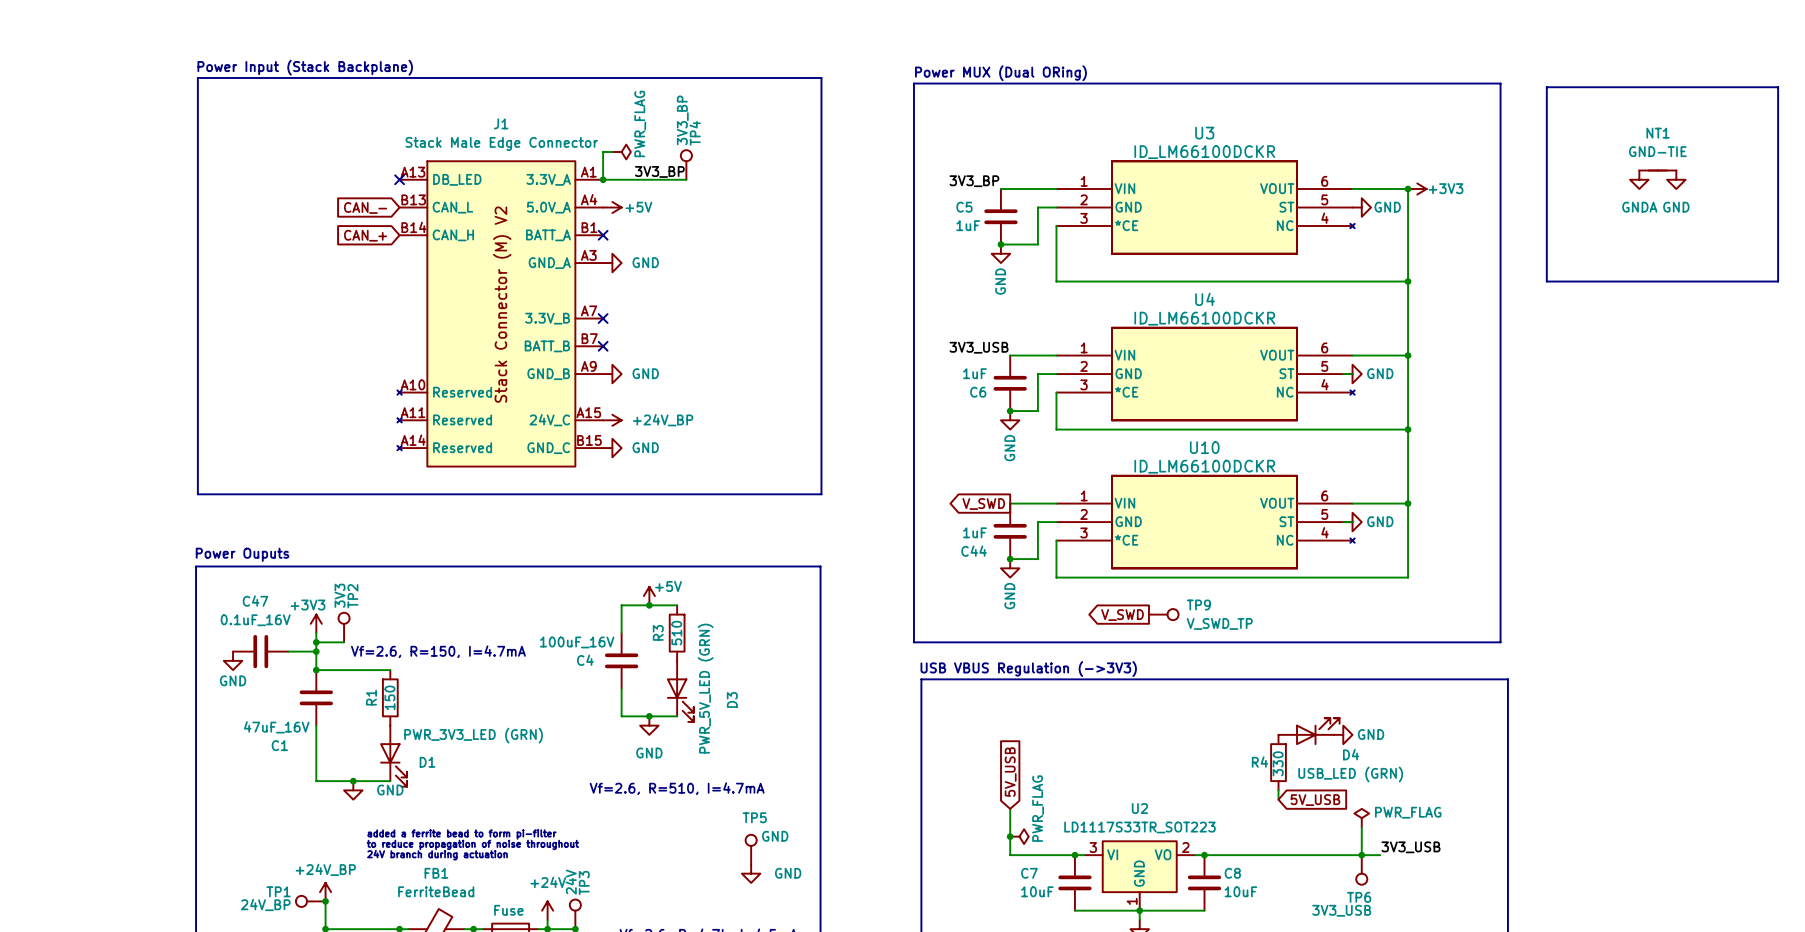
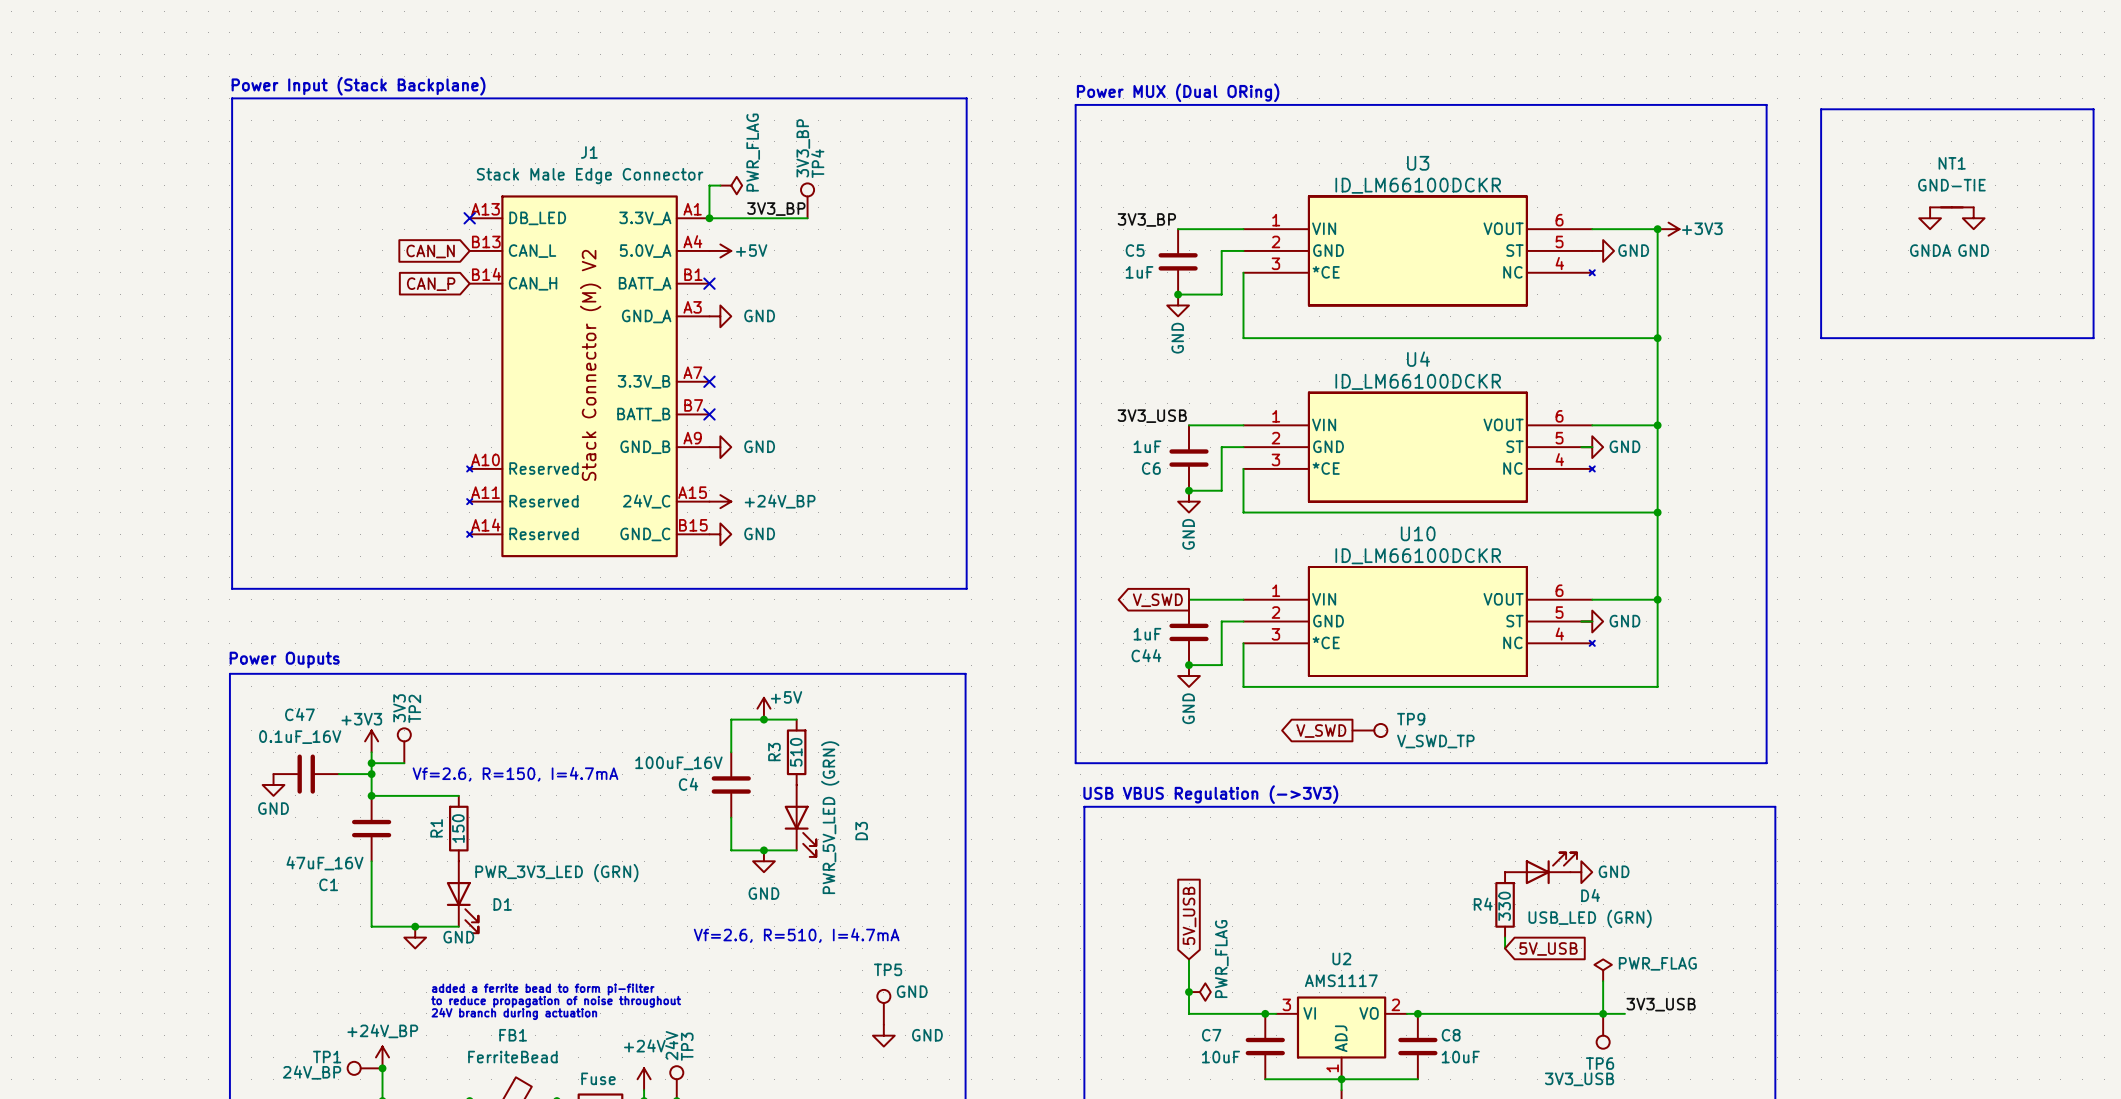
global label: CAN_- (365, 207) -> CAN_N (430, 251)
global label: CAN_+ (365, 235) -> CAN_P (431, 284)
U2 value: LD1117S33TR_SOT223 (1139, 827) -> AMS1117 (1341, 980)
U2 pin name: GND (1139, 873) -> ADJ (1341, 1038)

